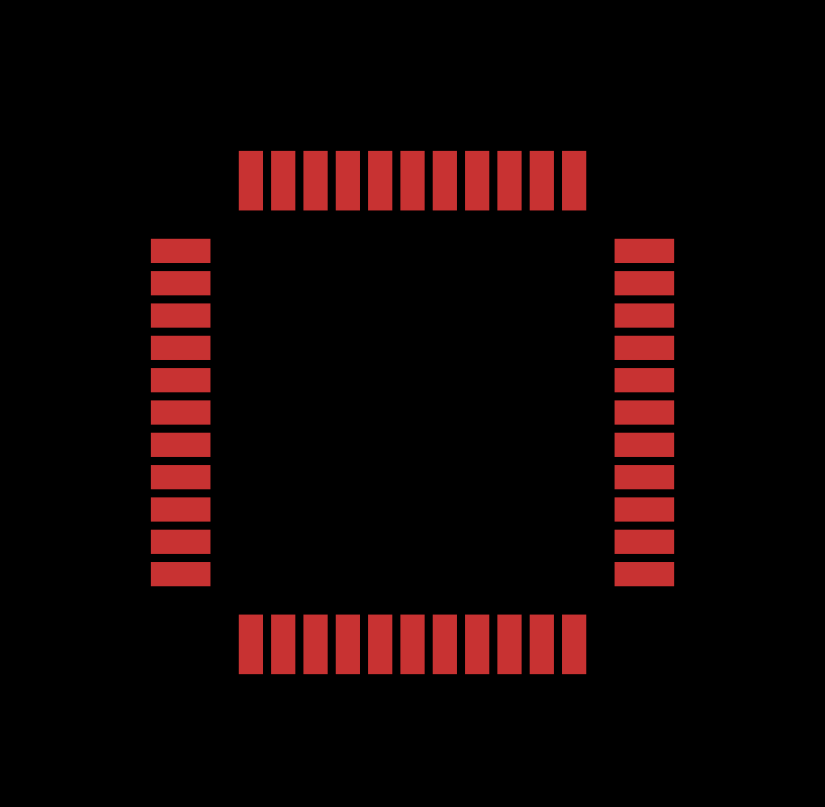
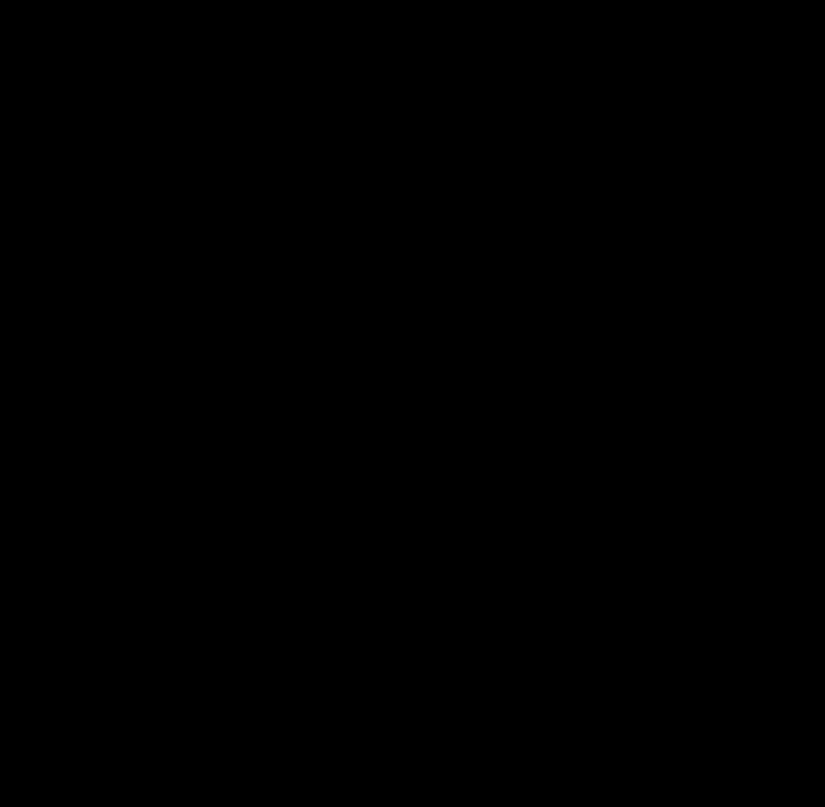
part: (412, 412) -> none

